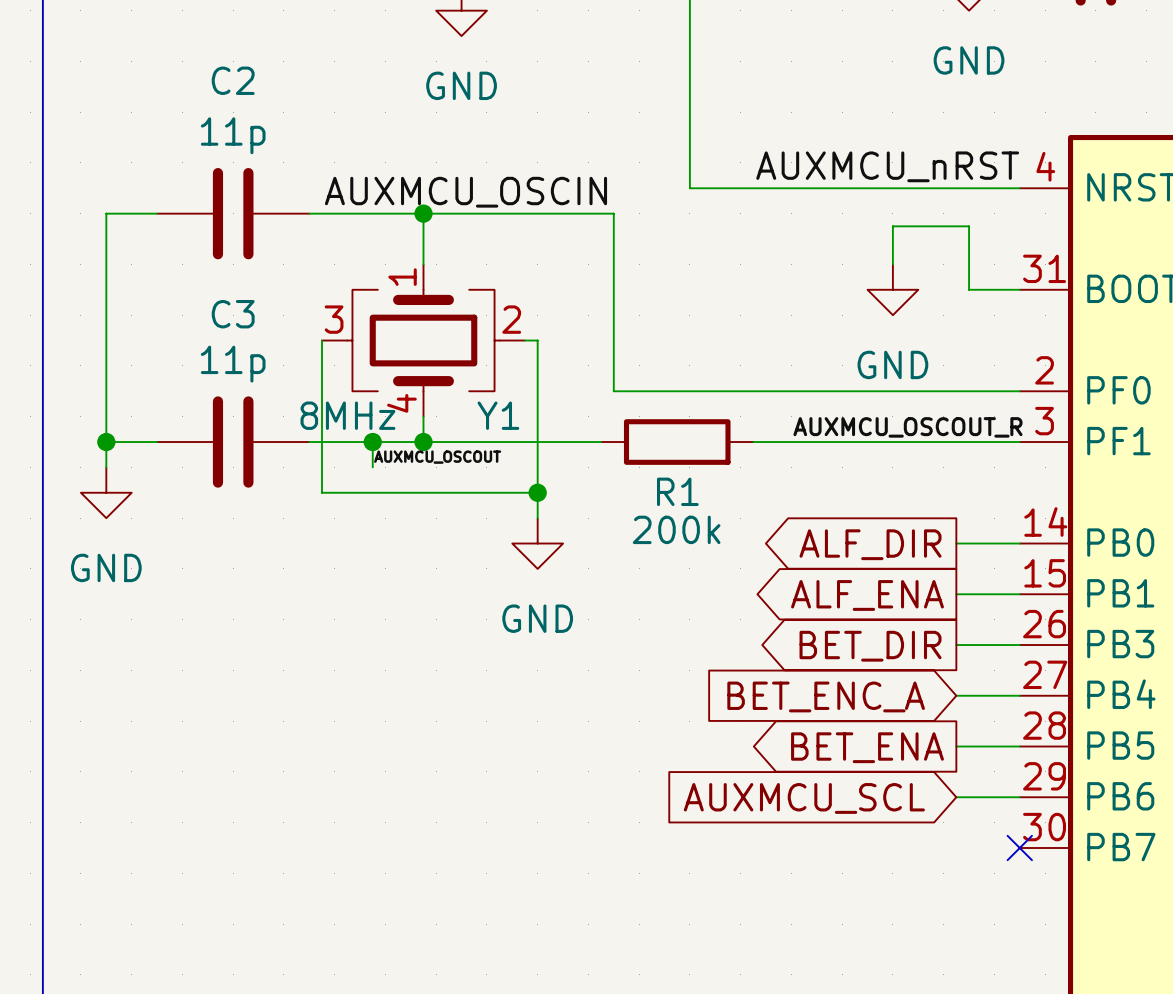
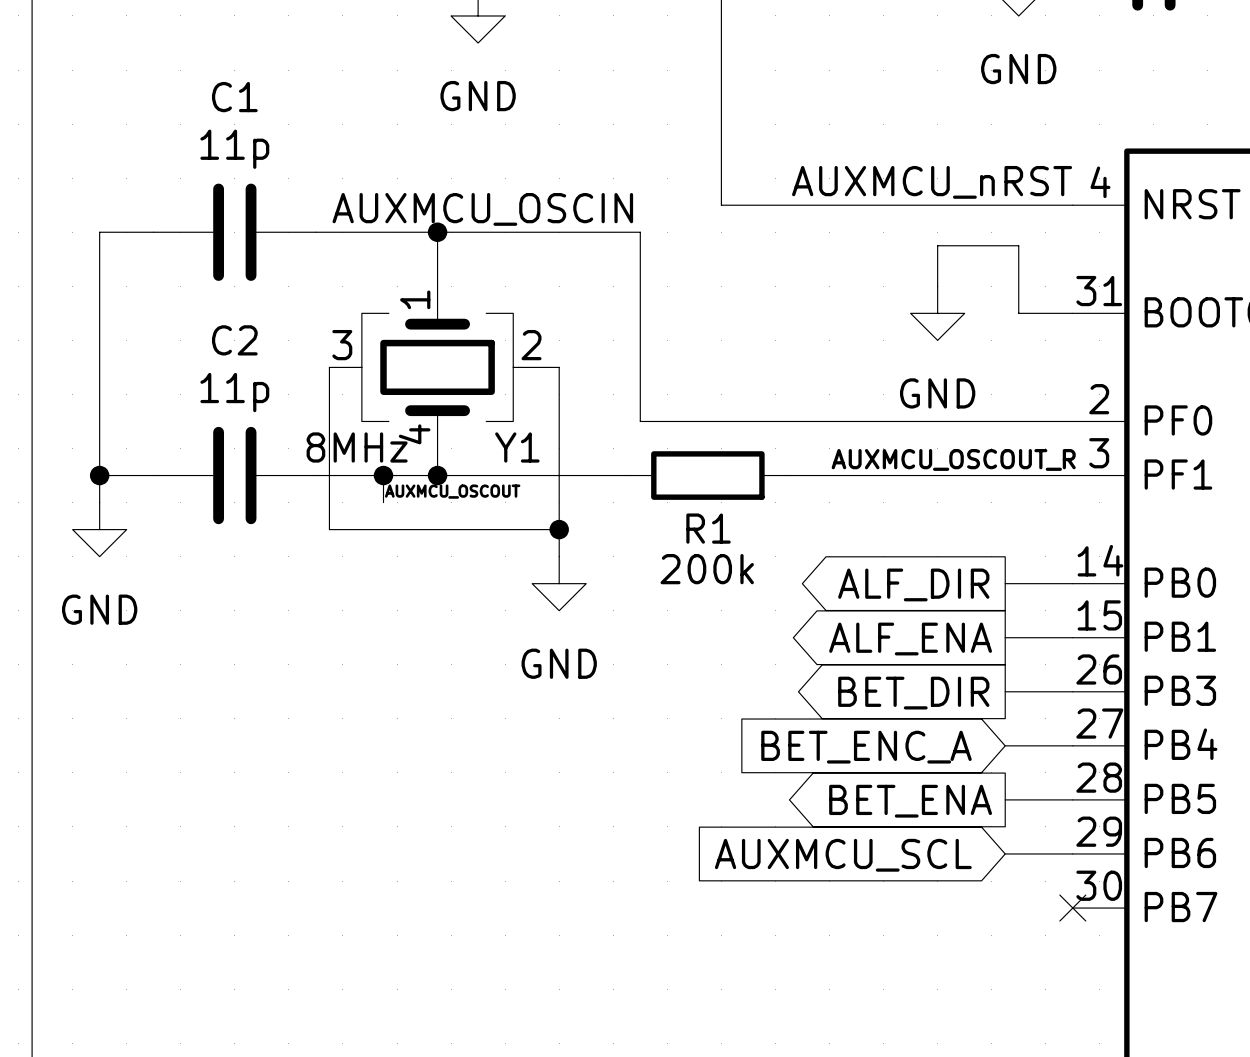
C2 name: C2 (233, 80) -> C1 (234, 97)
C3 name: C3 (233, 314) -> C2 (234, 340)

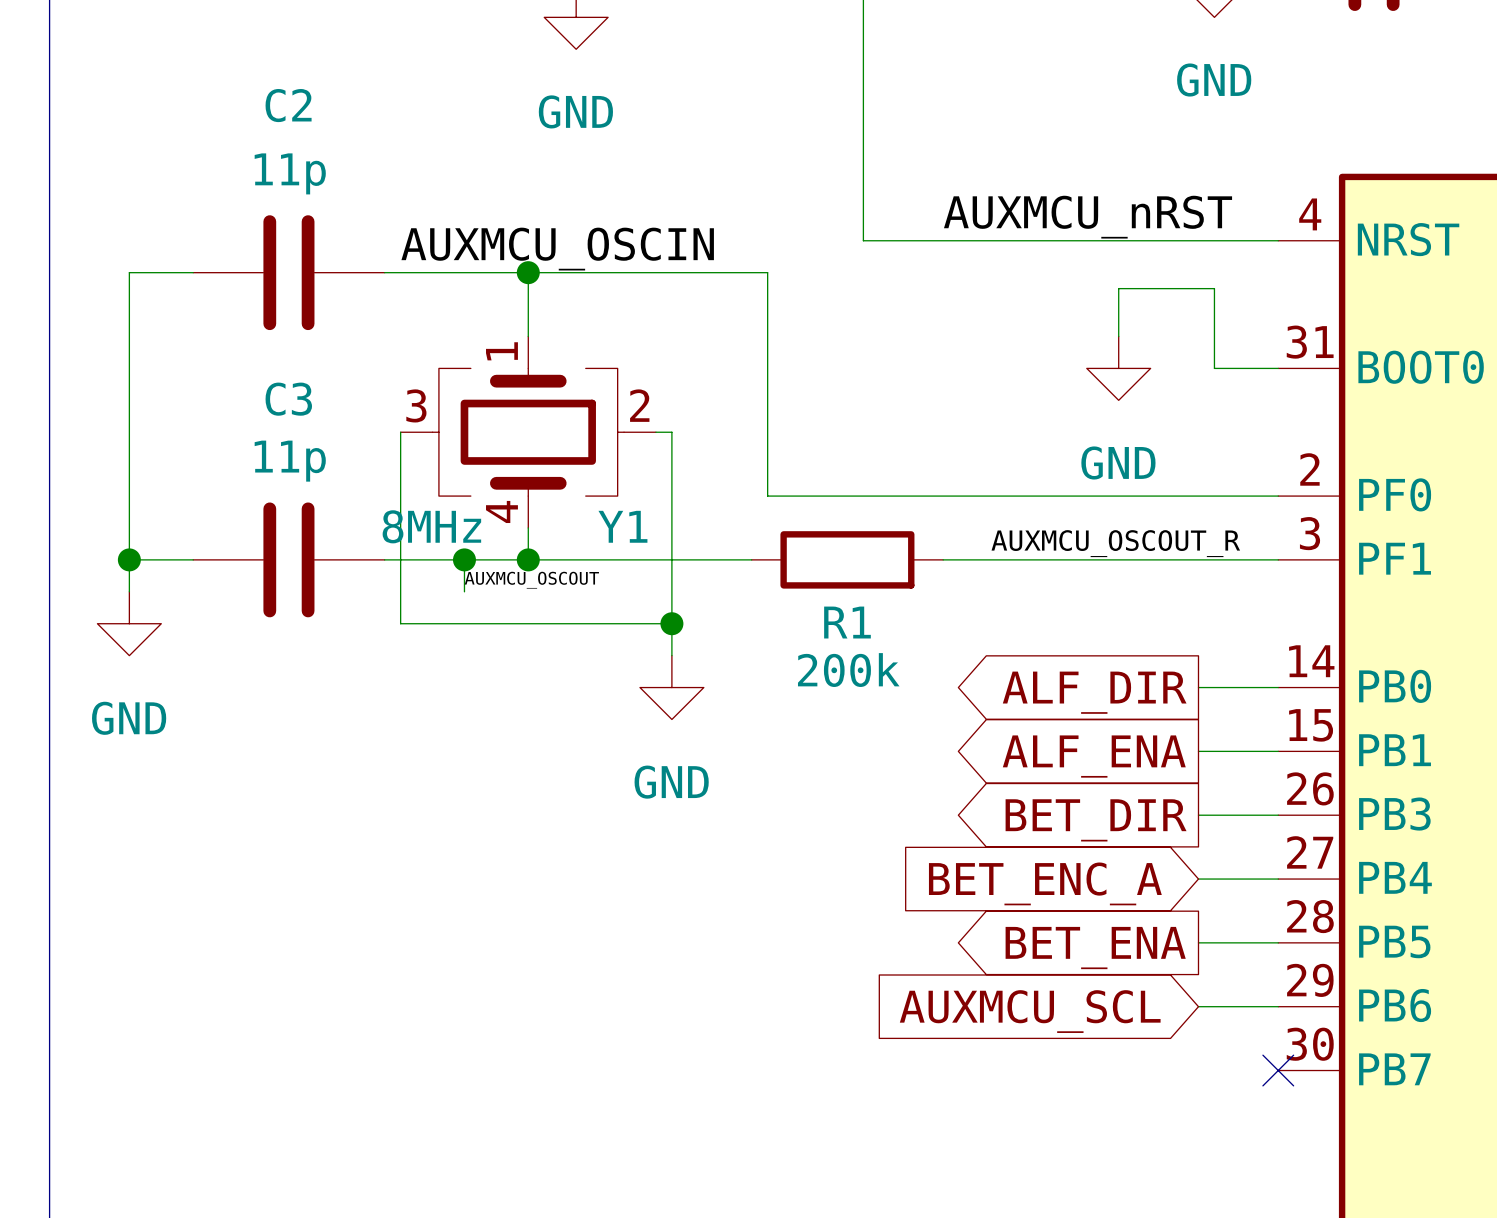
C1 name: C1 (234, 97) -> C2 (288, 105)
C2 name: C2 (234, 340) -> C3 (288, 399)

